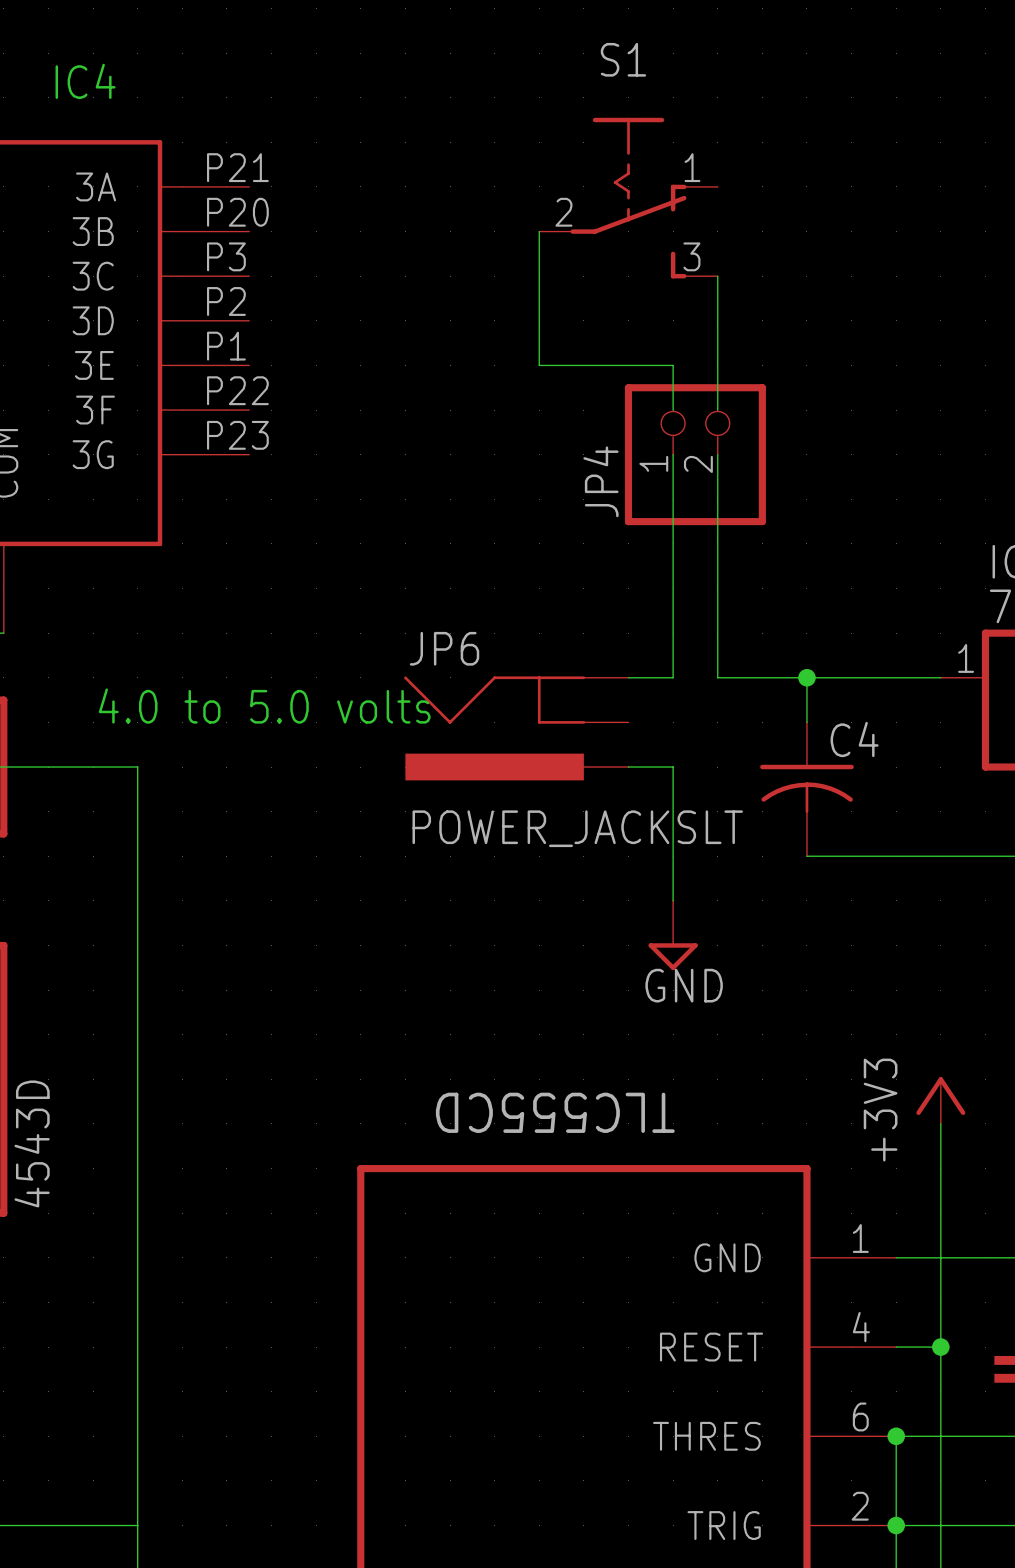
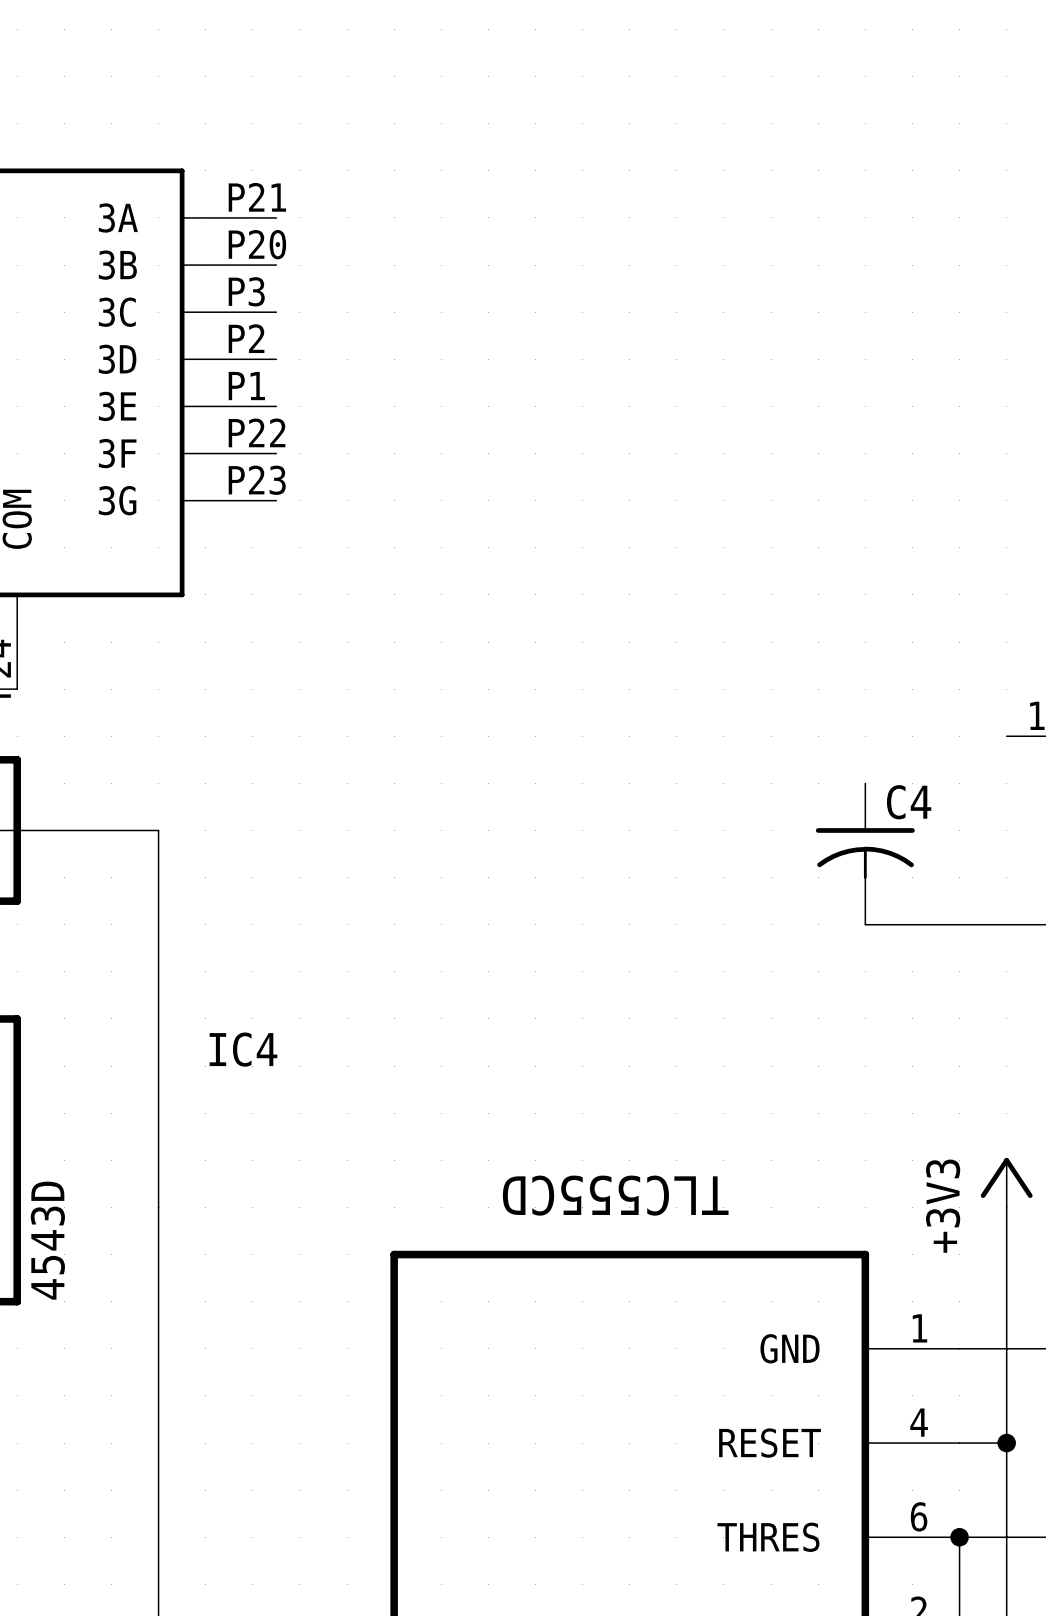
text: IC4 (85, 81) -> none
S1: (628, 198) -> none
wire: (539, 231) (539, 365) (673, 365) (673, 410) -> none
wire: (717, 276) (717, 410) -> none
wire: (673, 454) (673, 677) (628, 677) -> none
JP4: (695, 454) -> none
wire: (717, 454) (717, 677) (940, 677) -> none
wire: (806, 677) (806, 722) -> none
junction: (806, 677) -> none
text: 4.0 to 5.0 volts (264, 706) -> none
JP6: POWER_JACKSLT (516, 728) -> none
wire: (628, 767) (673, 767) (673, 900) -> none
power symbol: GND (673, 935) -> none
text: none -> IC4 (243, 1049)

